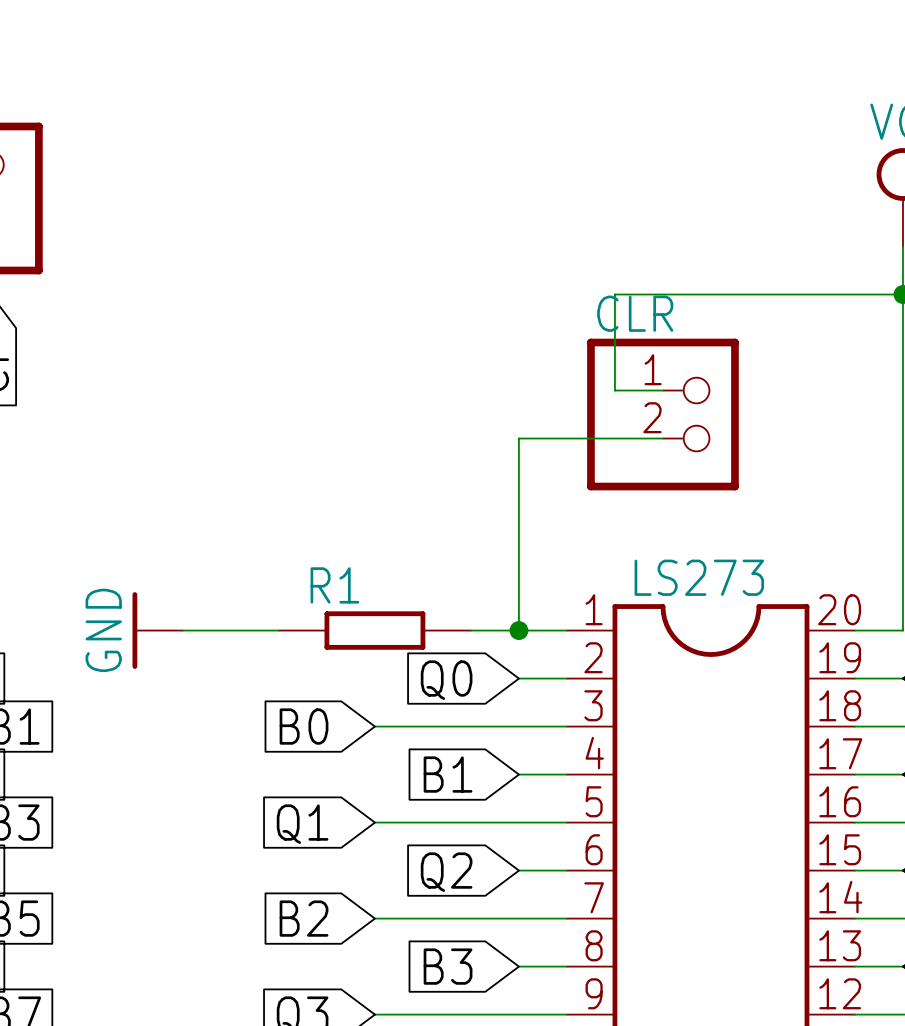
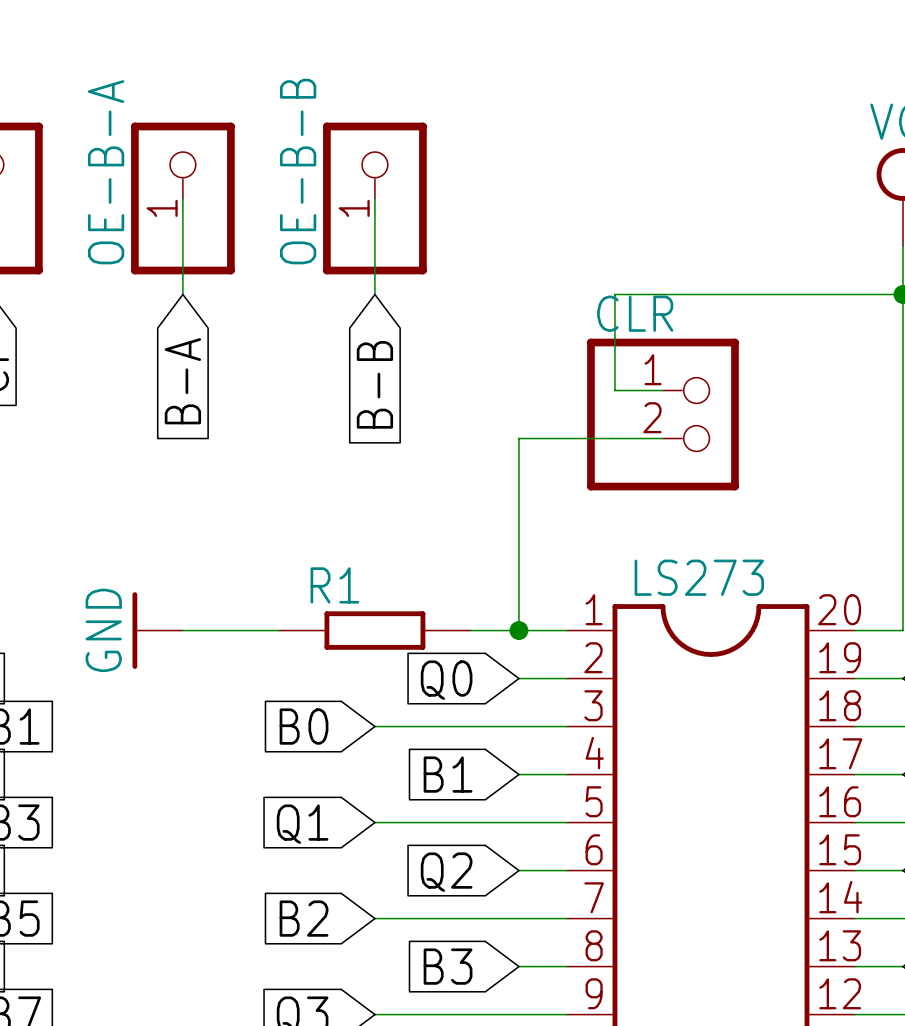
wire: none -> (182, 198) (182, 294)
OE-B-A: none -> (182, 198)
wire: none -> (374, 198) (374, 294)
OE-B-B: none -> (374, 198)
global label: none -> B-A (182, 381)
global label: none -> B-B (374, 384)

